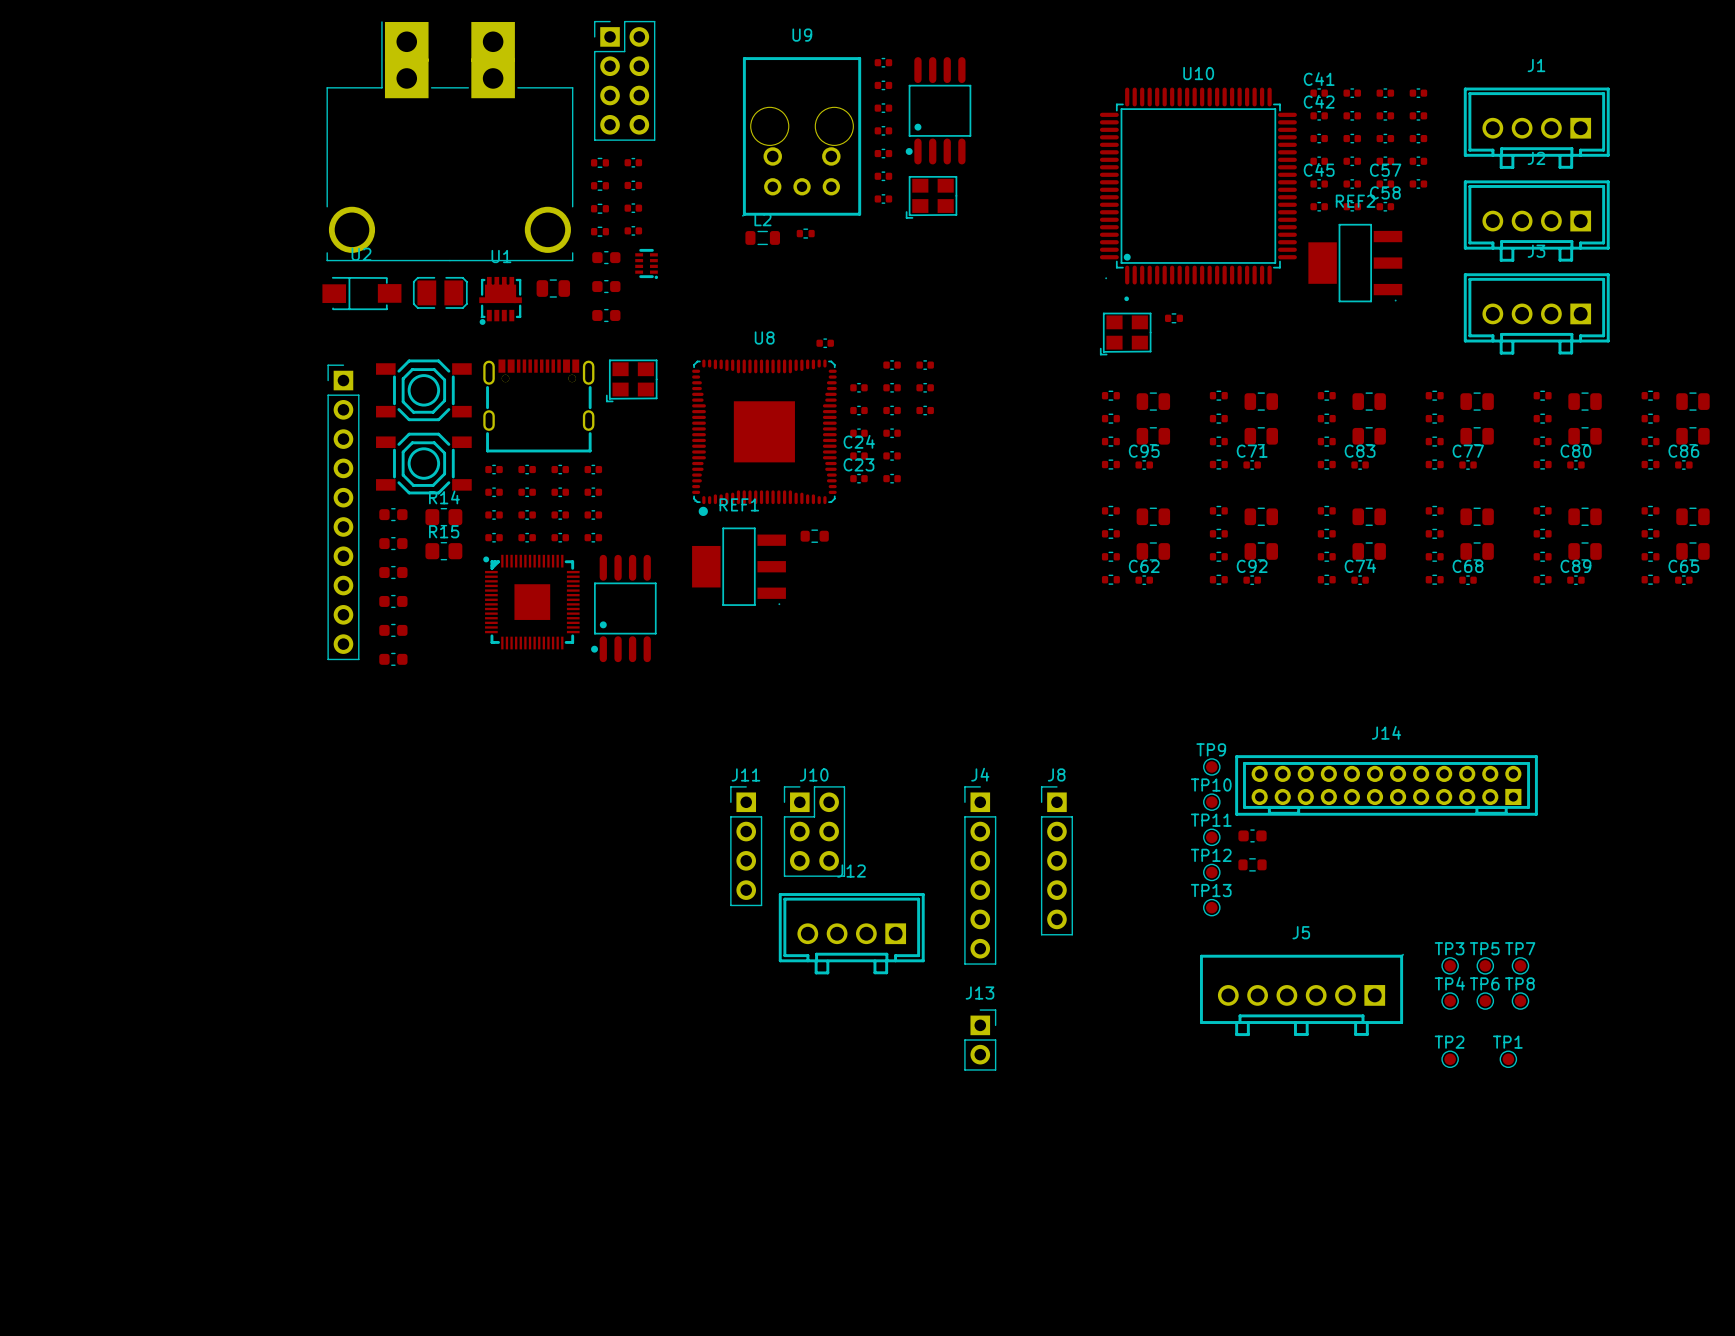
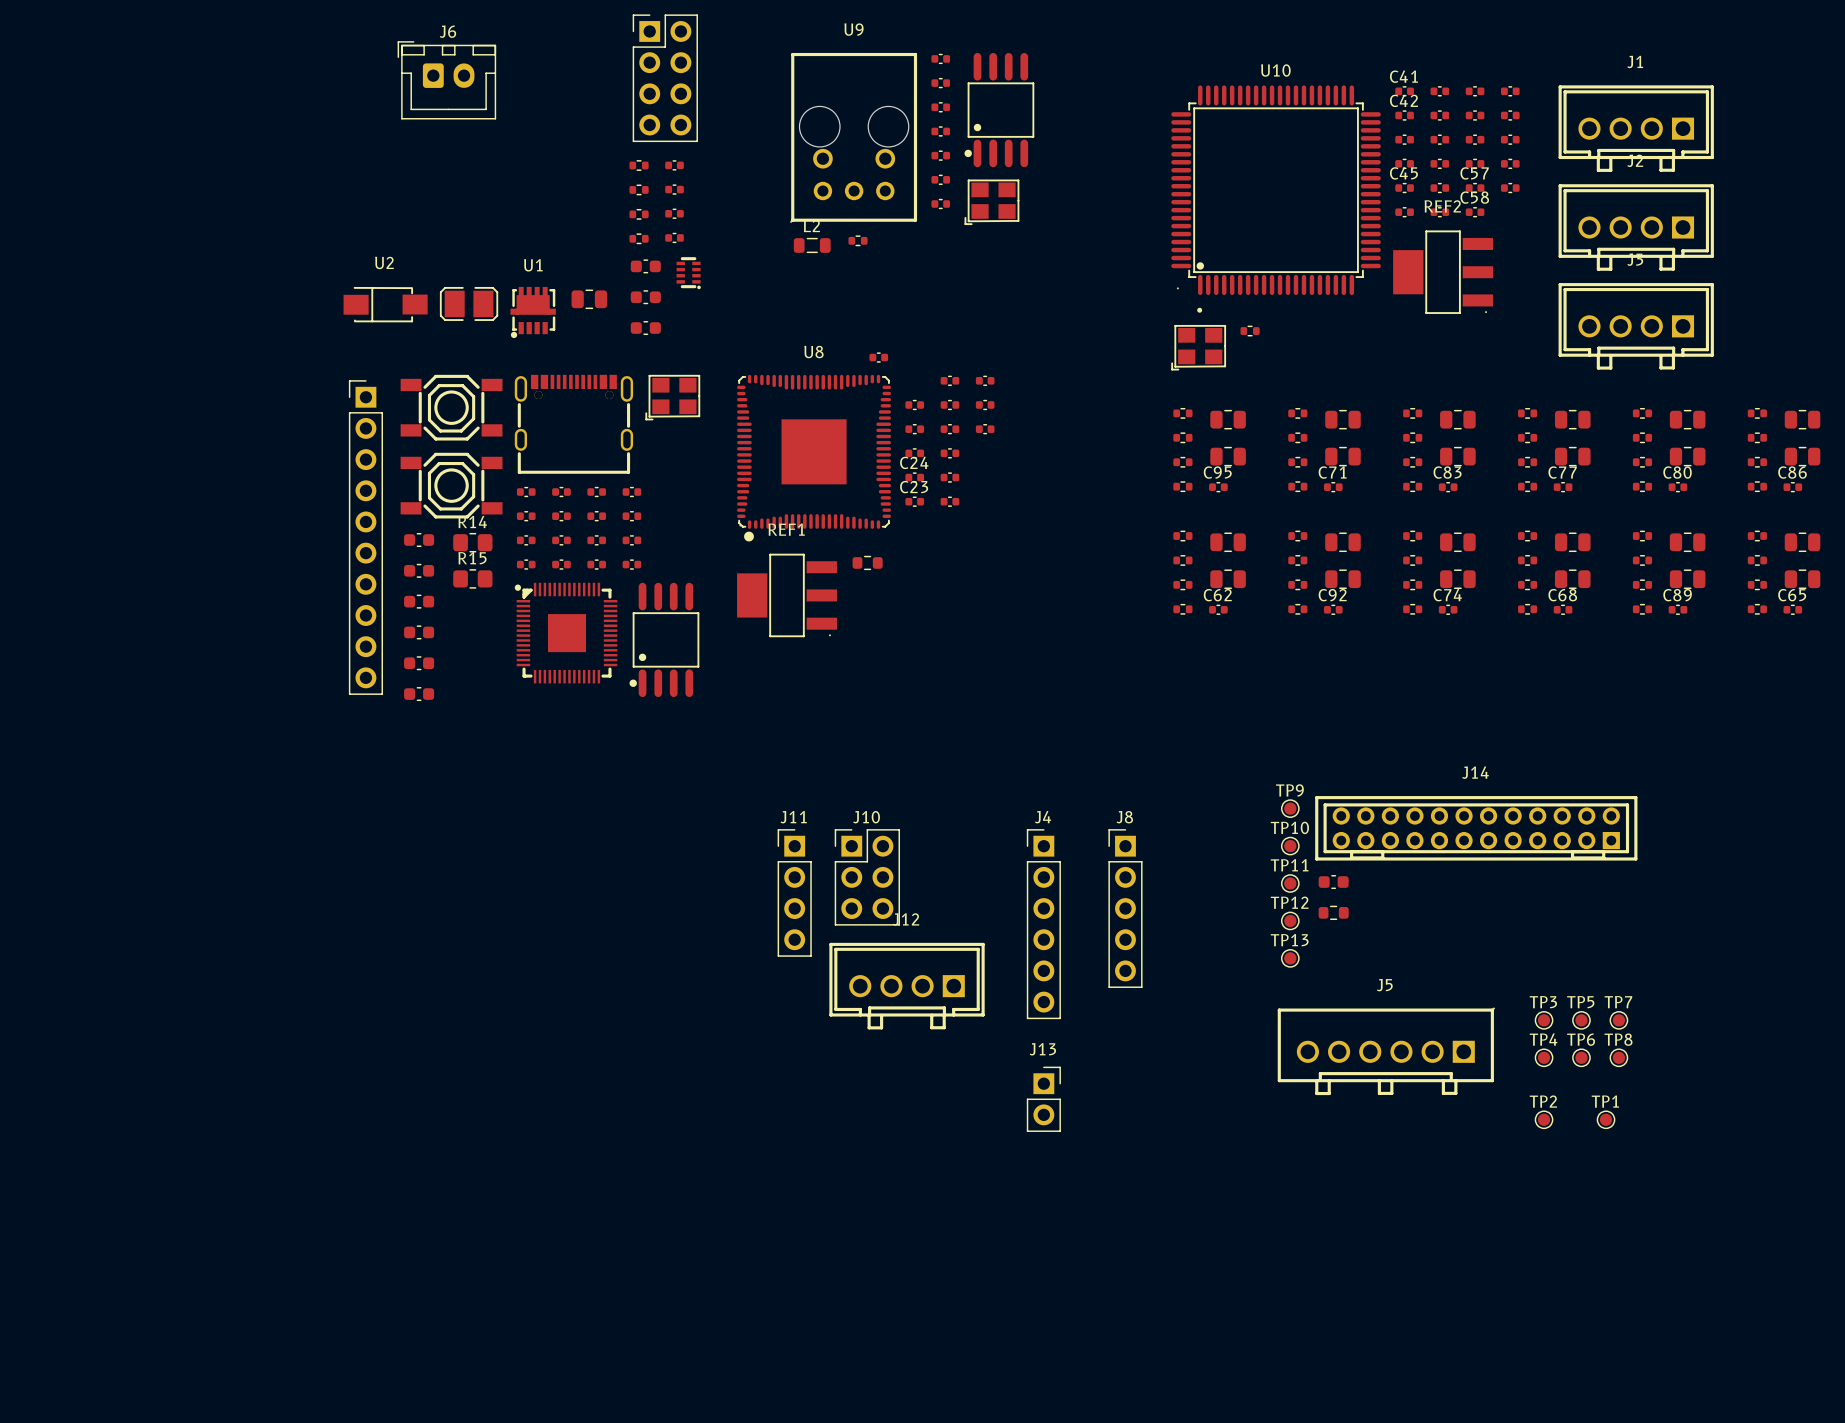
J6: none -> (446, 80)
part: (449, 141) -> none

